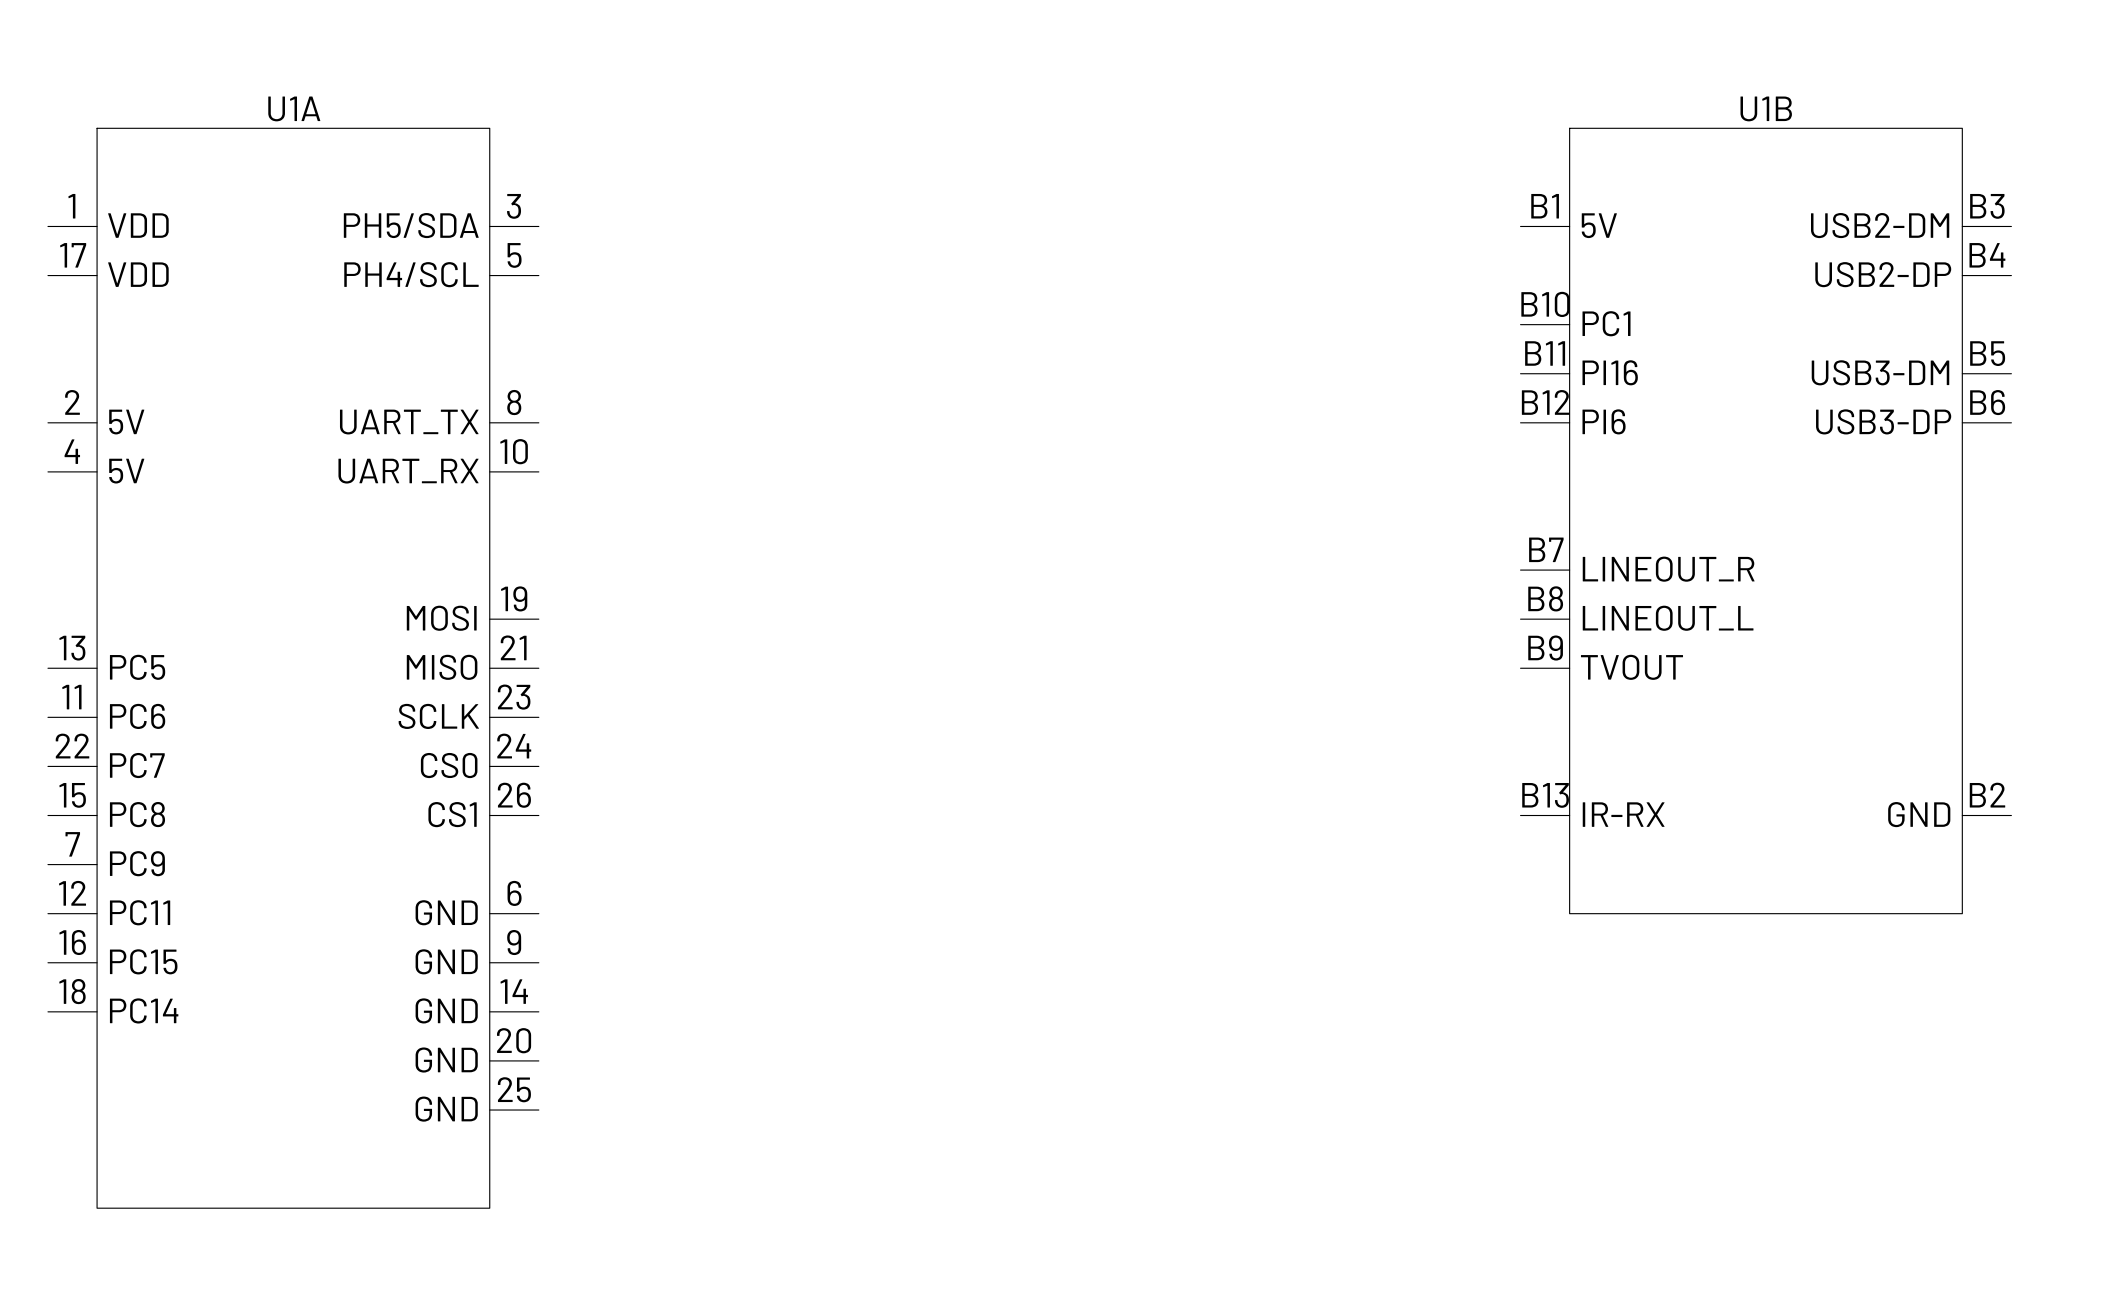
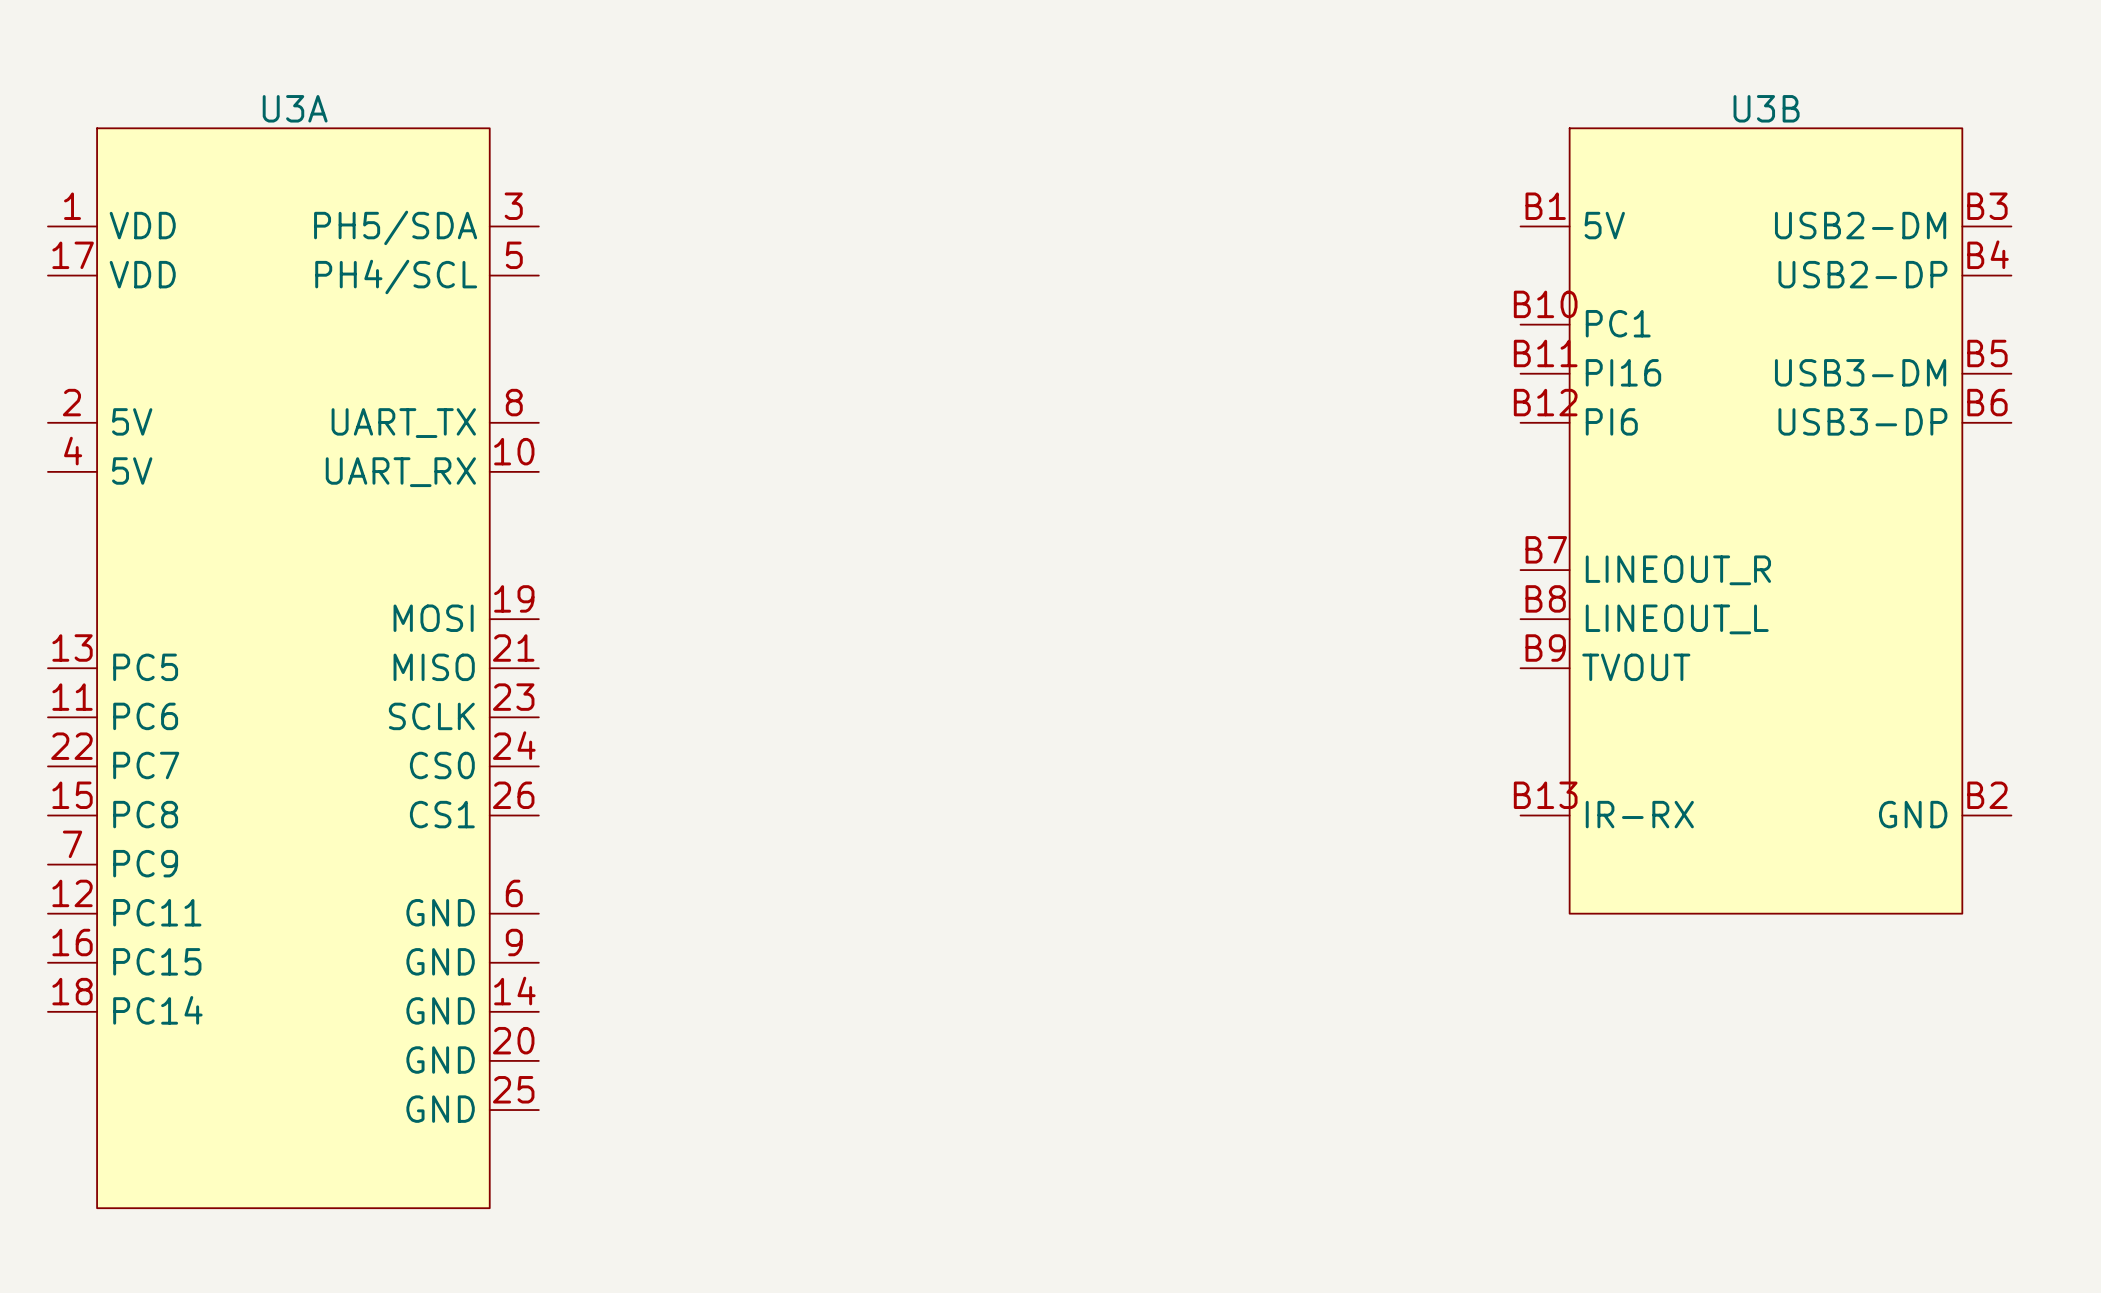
U1A name: U1A (294, 108) -> U3A (295, 108)
U1B name: U1B (1766, 108) -> U3B (1766, 108)

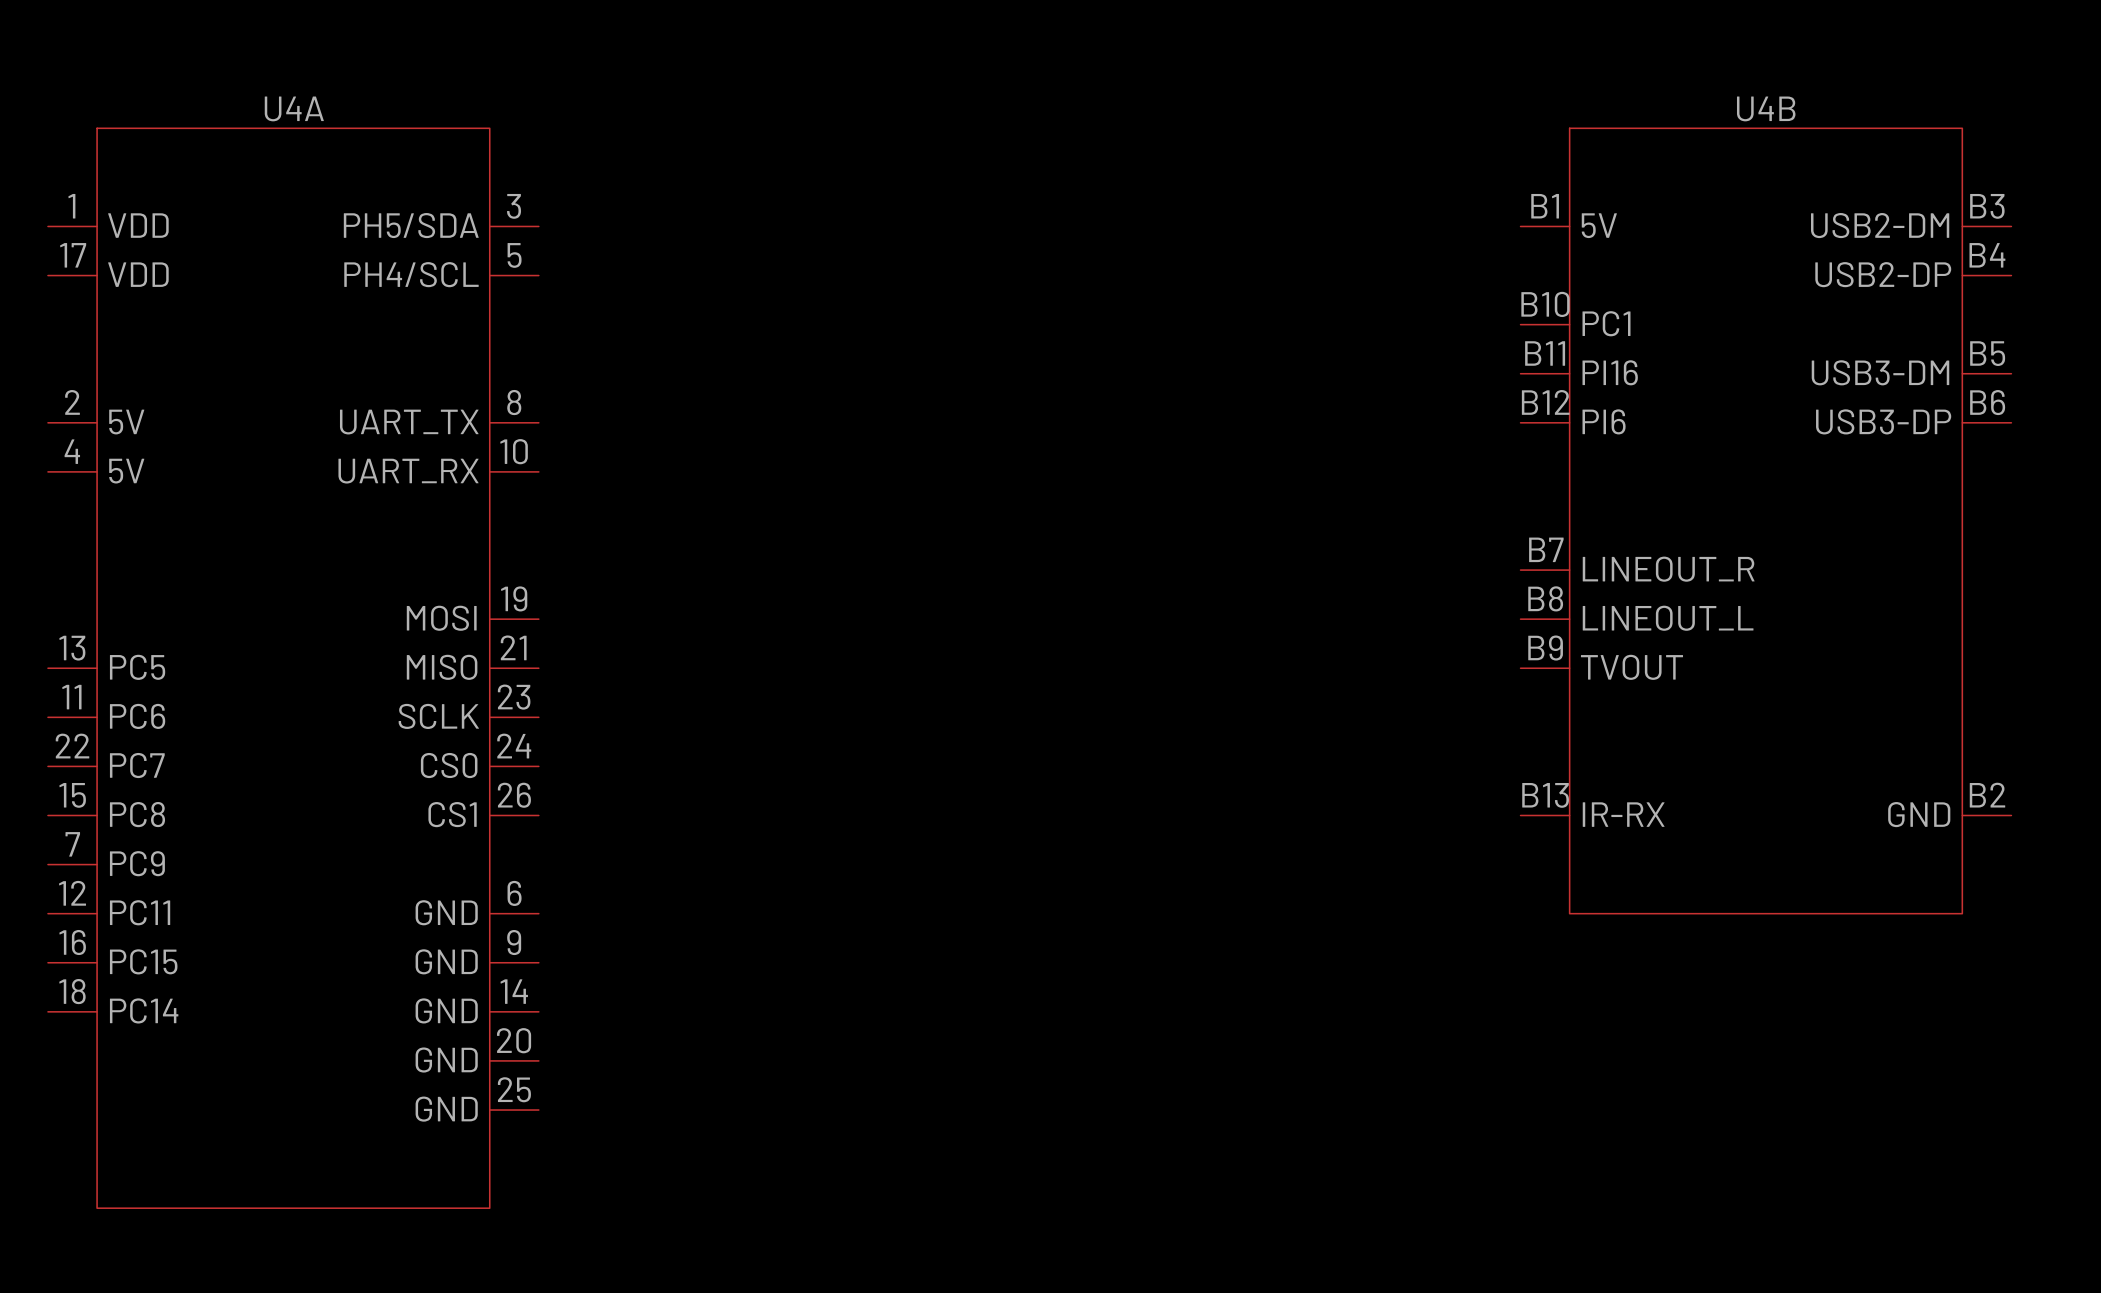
U3A name: U3A (295, 108) -> U4A (294, 108)
U3B name: U3B (1766, 108) -> U4B (1766, 108)

